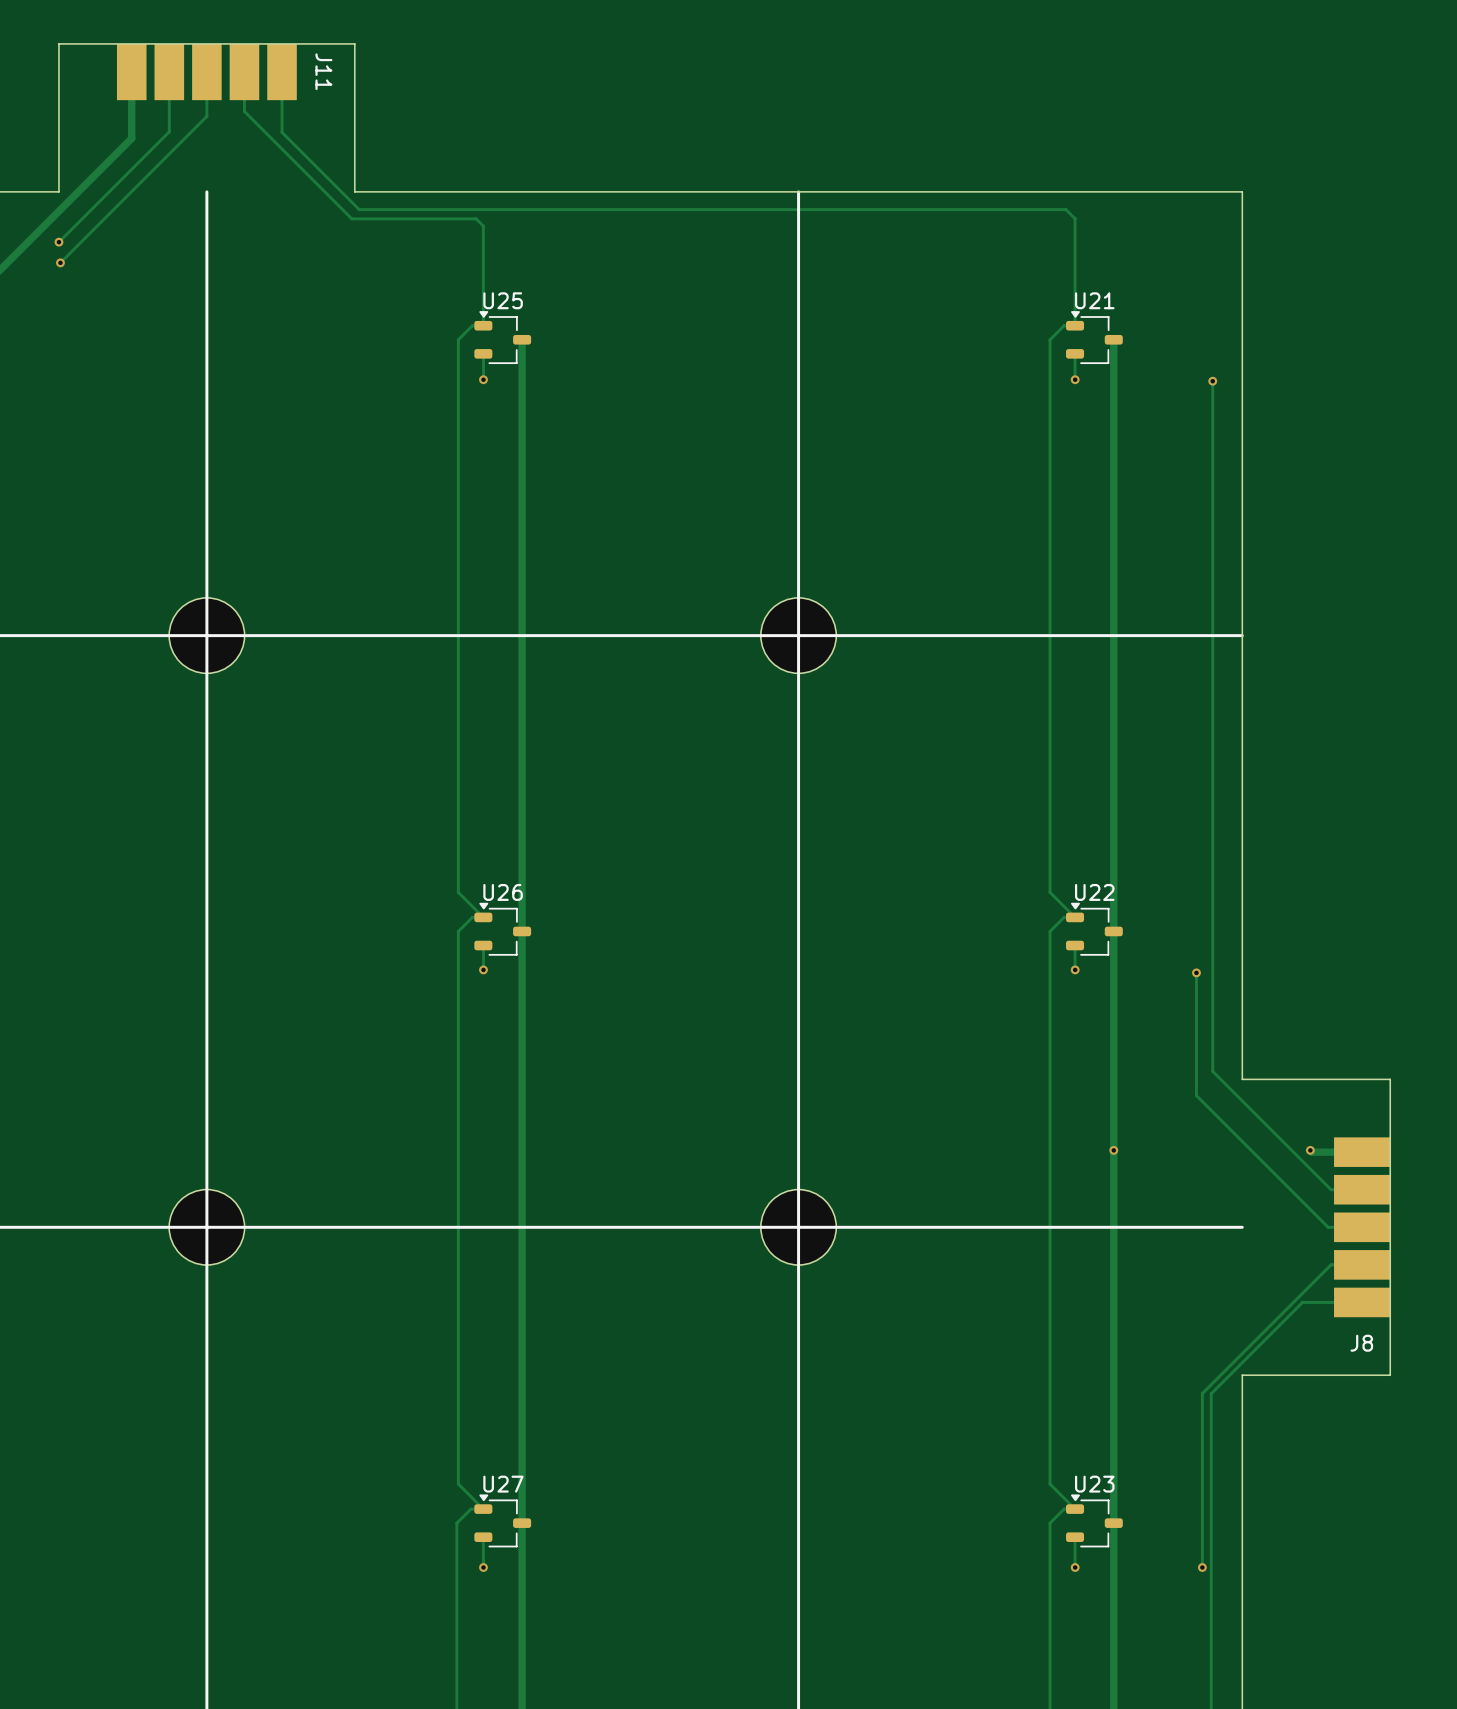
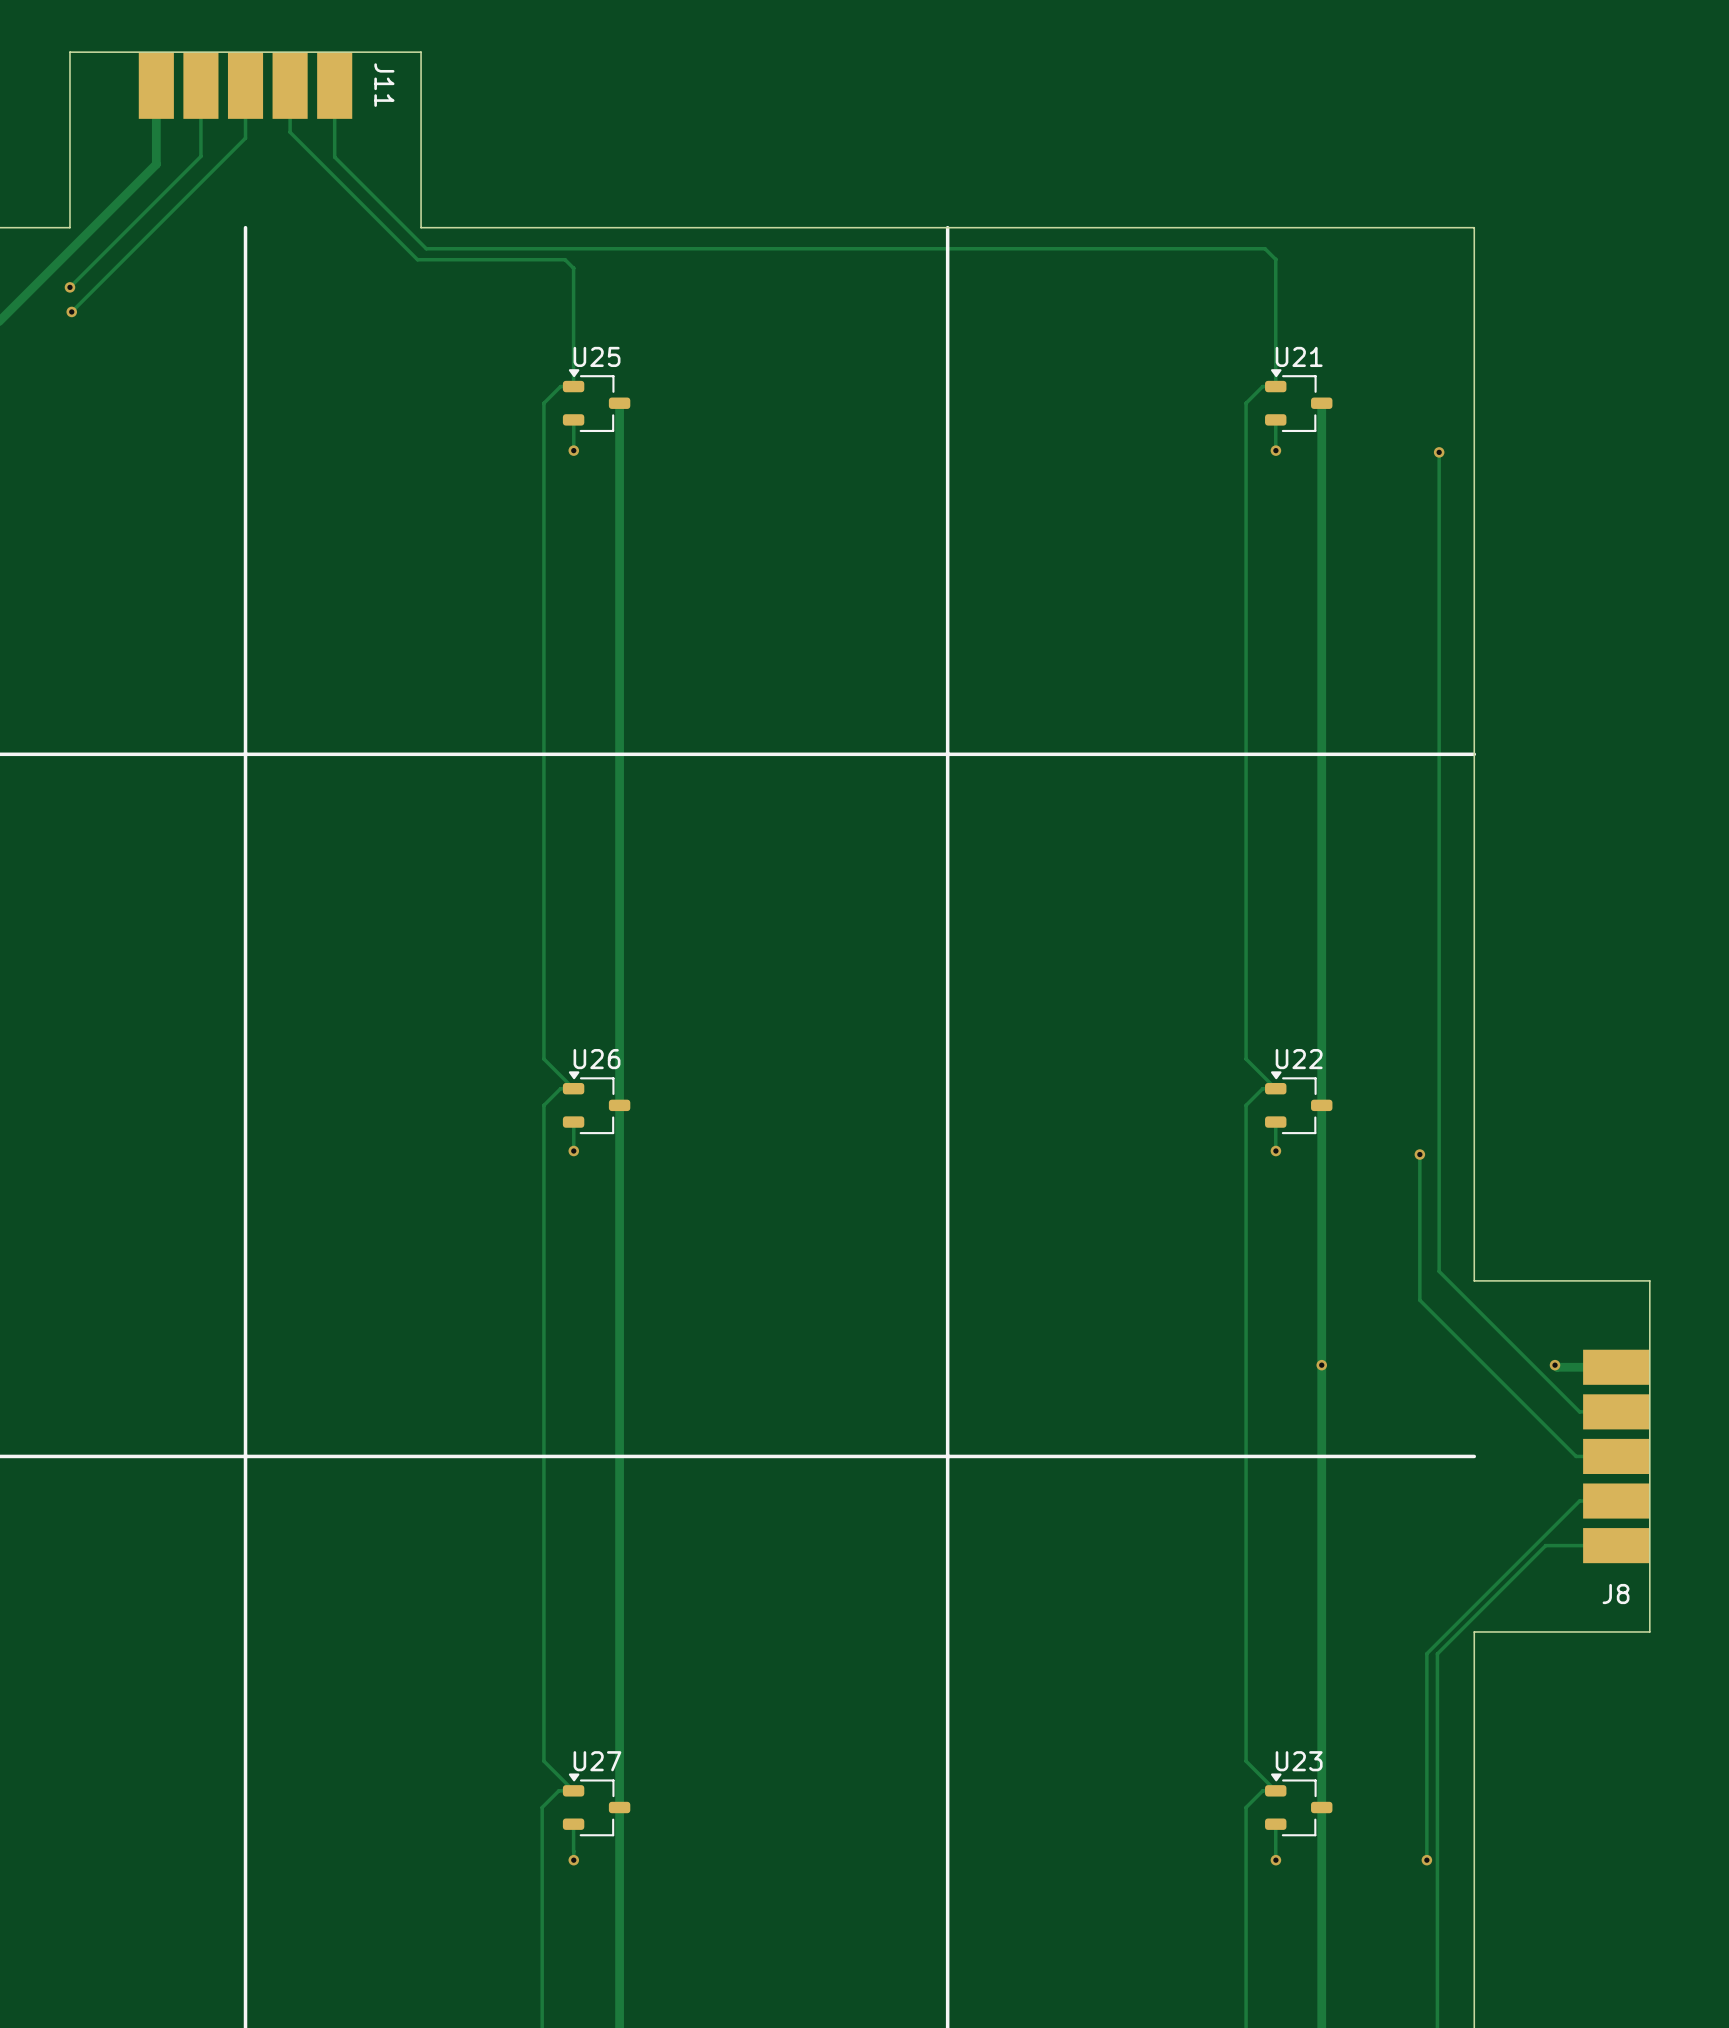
part: (206, 635) -> none
part: (798, 635) -> none
part: (206, 1227) -> none
part: (798, 1227) -> none

